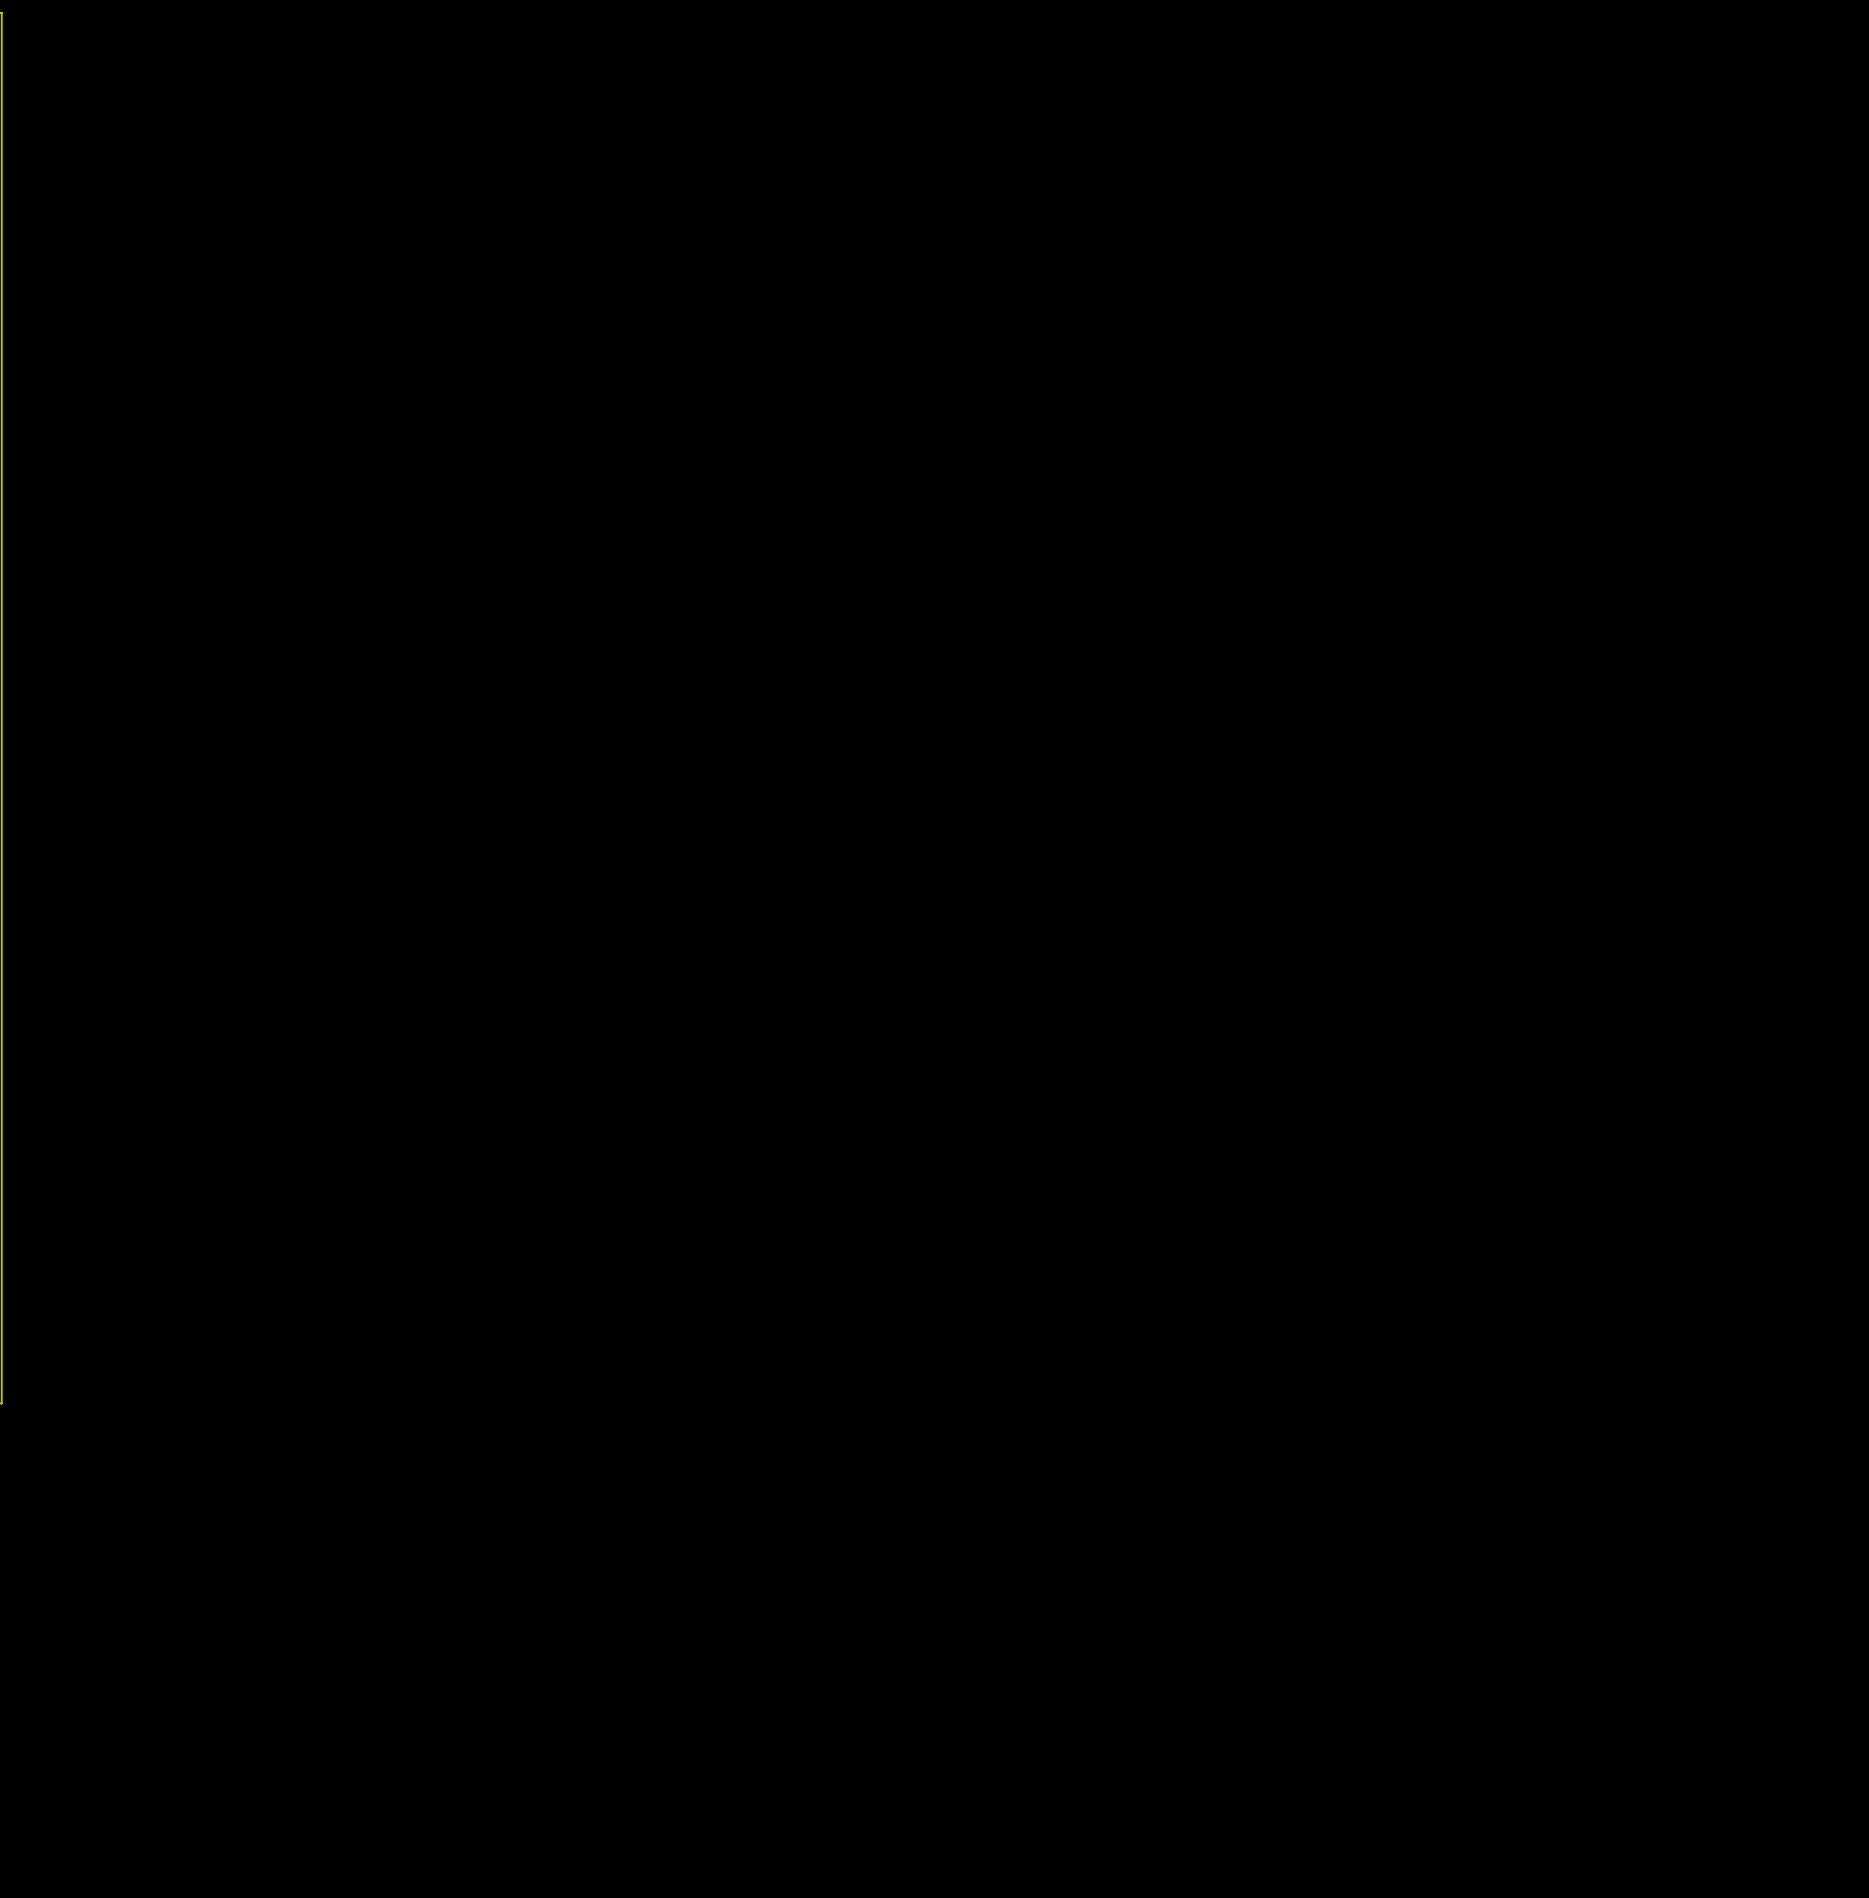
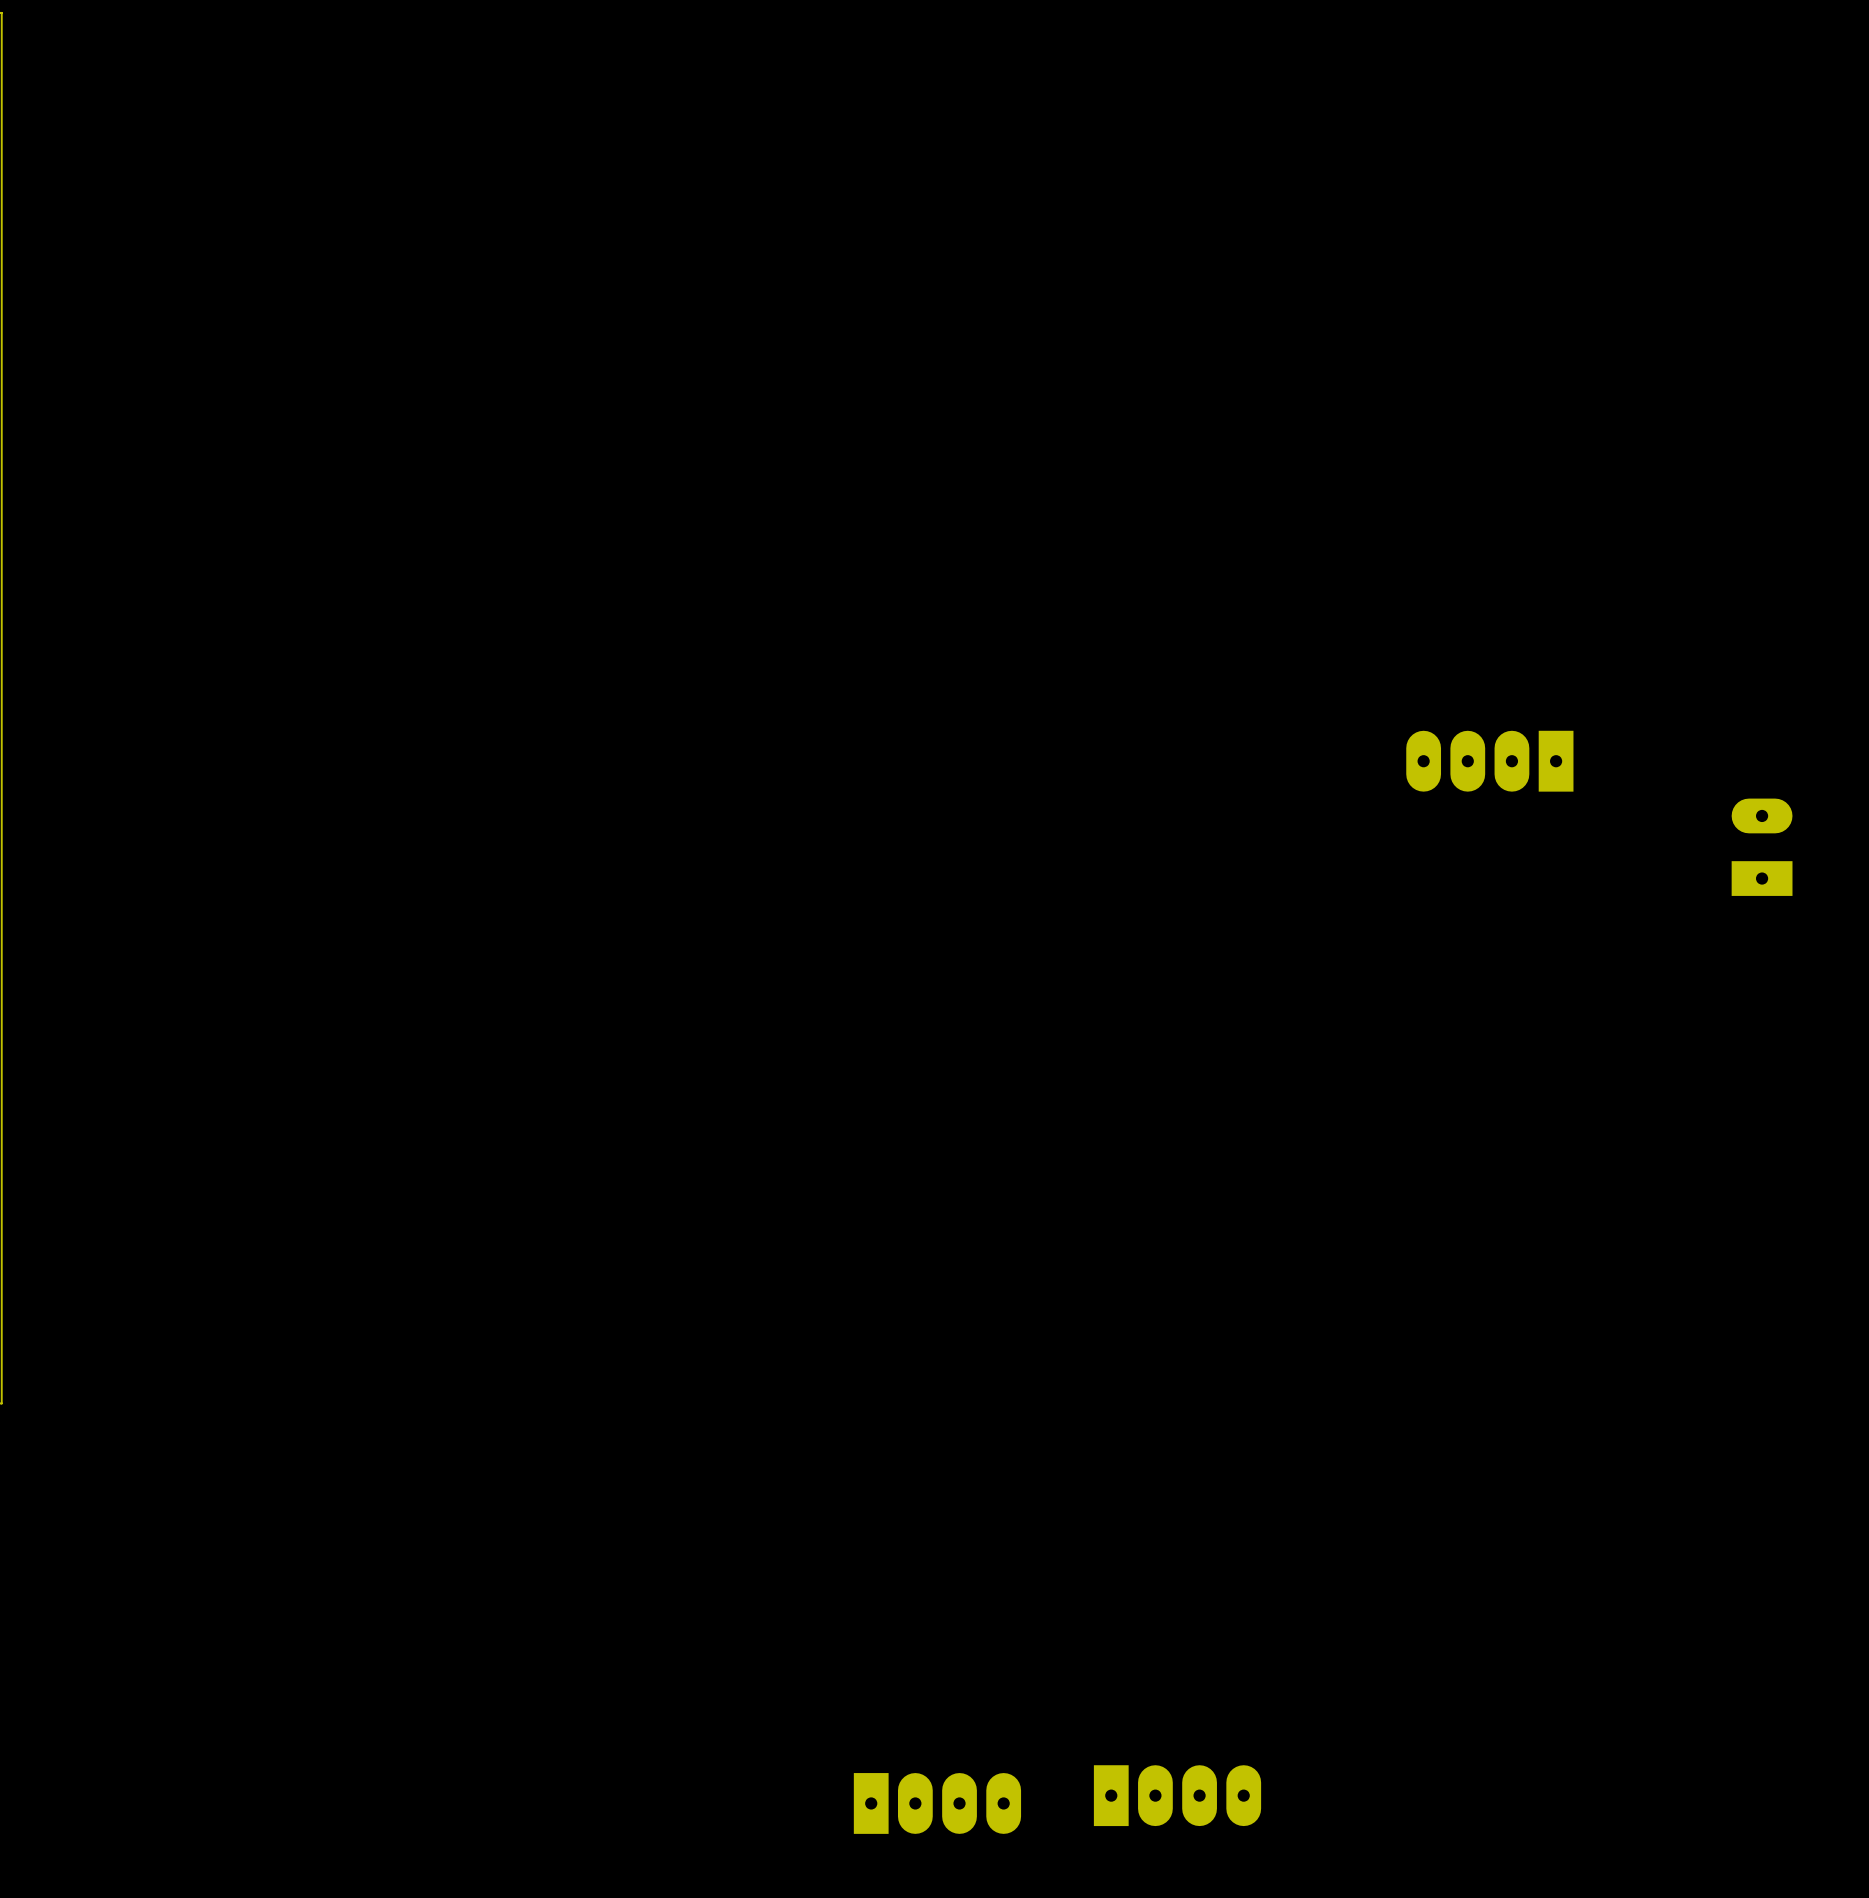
part: none -> (1489, 761)
part: none -> (1762, 847)
part: none -> (1177, 1795)
part: none -> (937, 1803)

